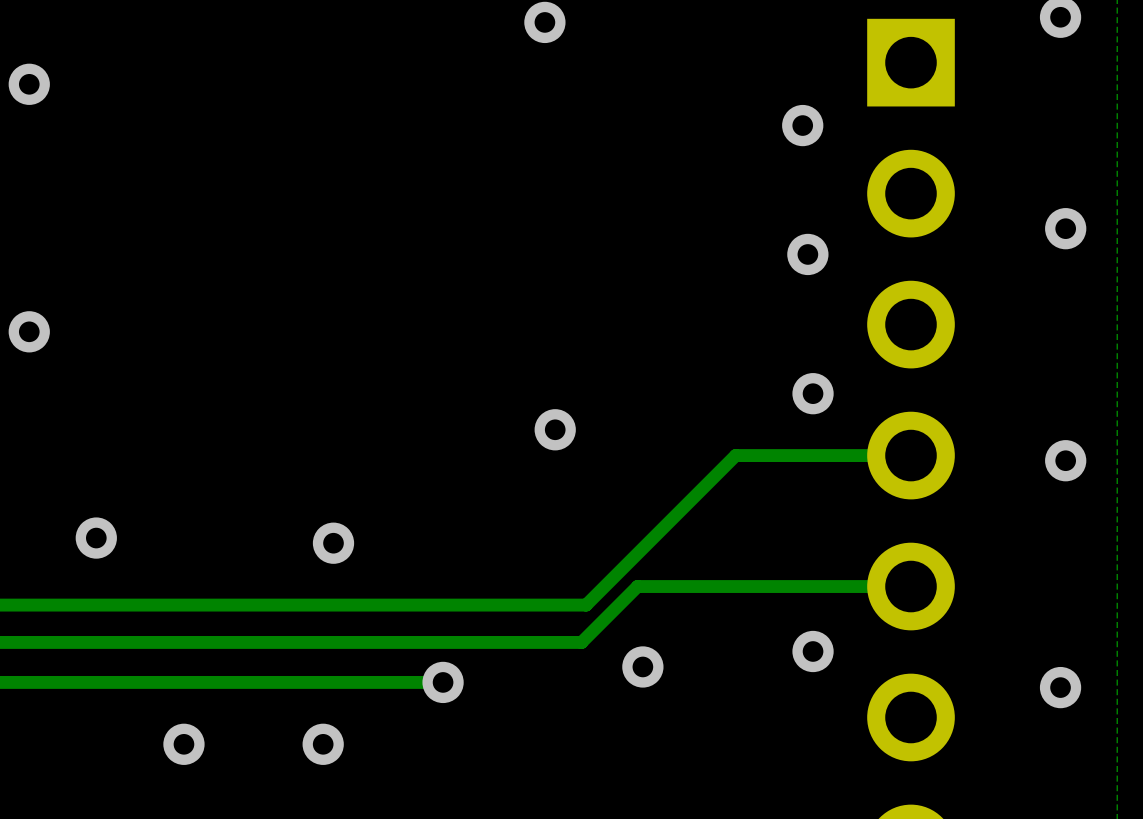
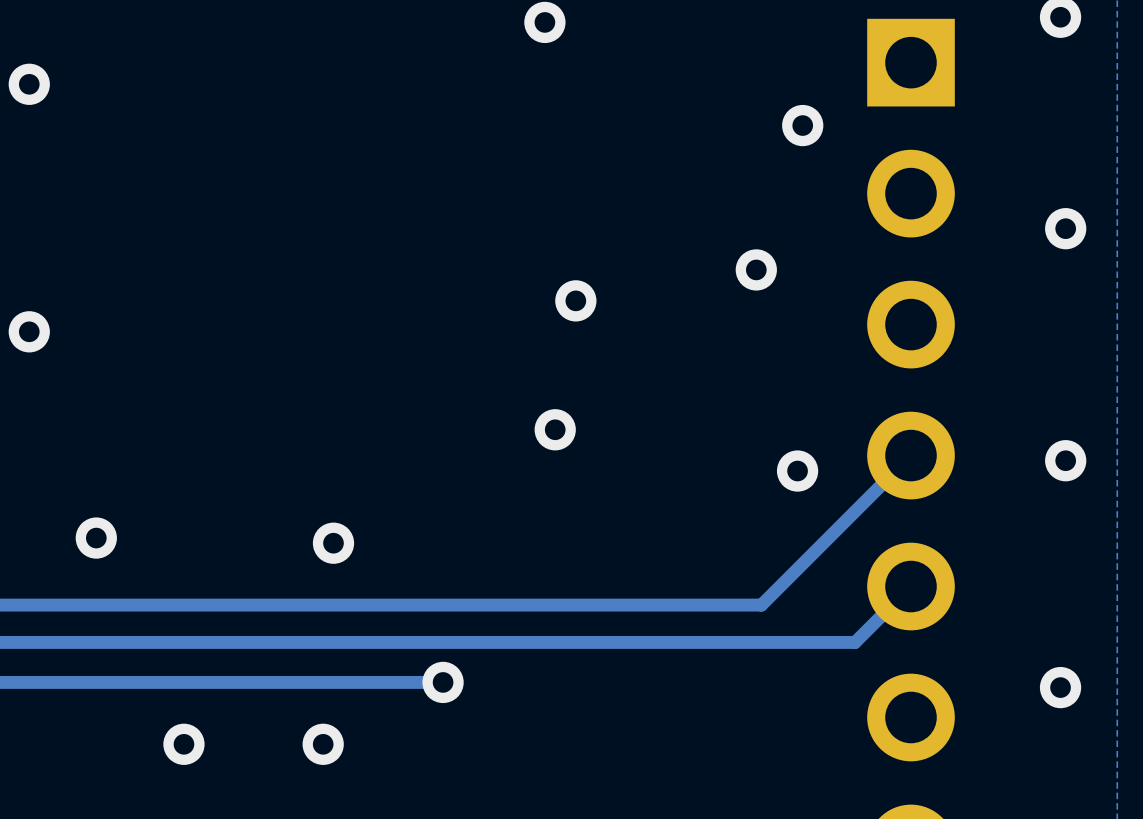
via position: (807, 254) -> (756, 269)
via: none -> (575, 300)
via: (813, 393) -> none
track: (911, 455) (735, 455) (586, 605) -> (911, 455) (761, 605) (586, 605)
via: none -> (797, 471)
track: (911, 586) (637, 586) (581, 642) -> (911, 586) (855, 642) (581, 642)
via: (813, 651) -> none
via: (642, 666) -> none

